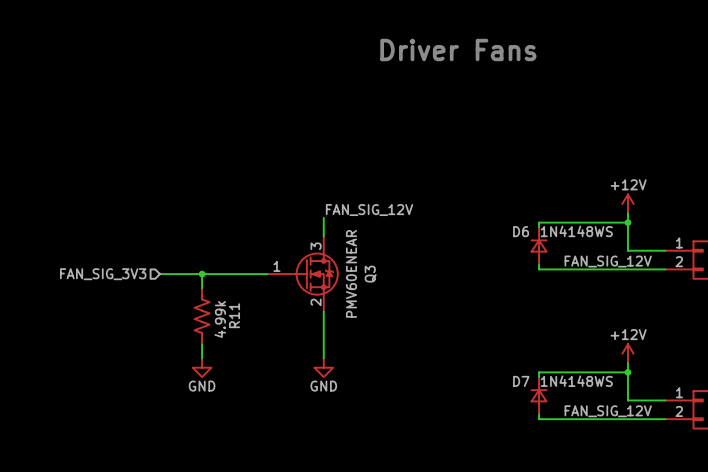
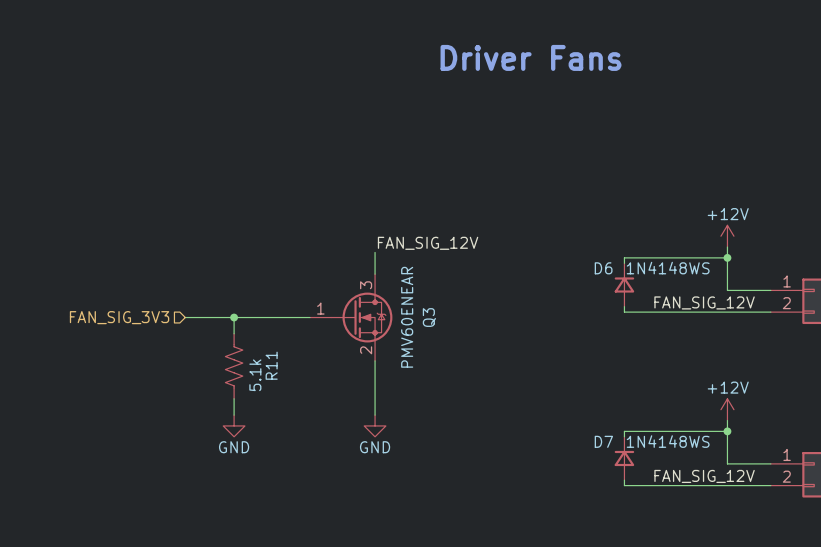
R11 value: 4.99k (220, 319) -> 5.1k (255, 375)

